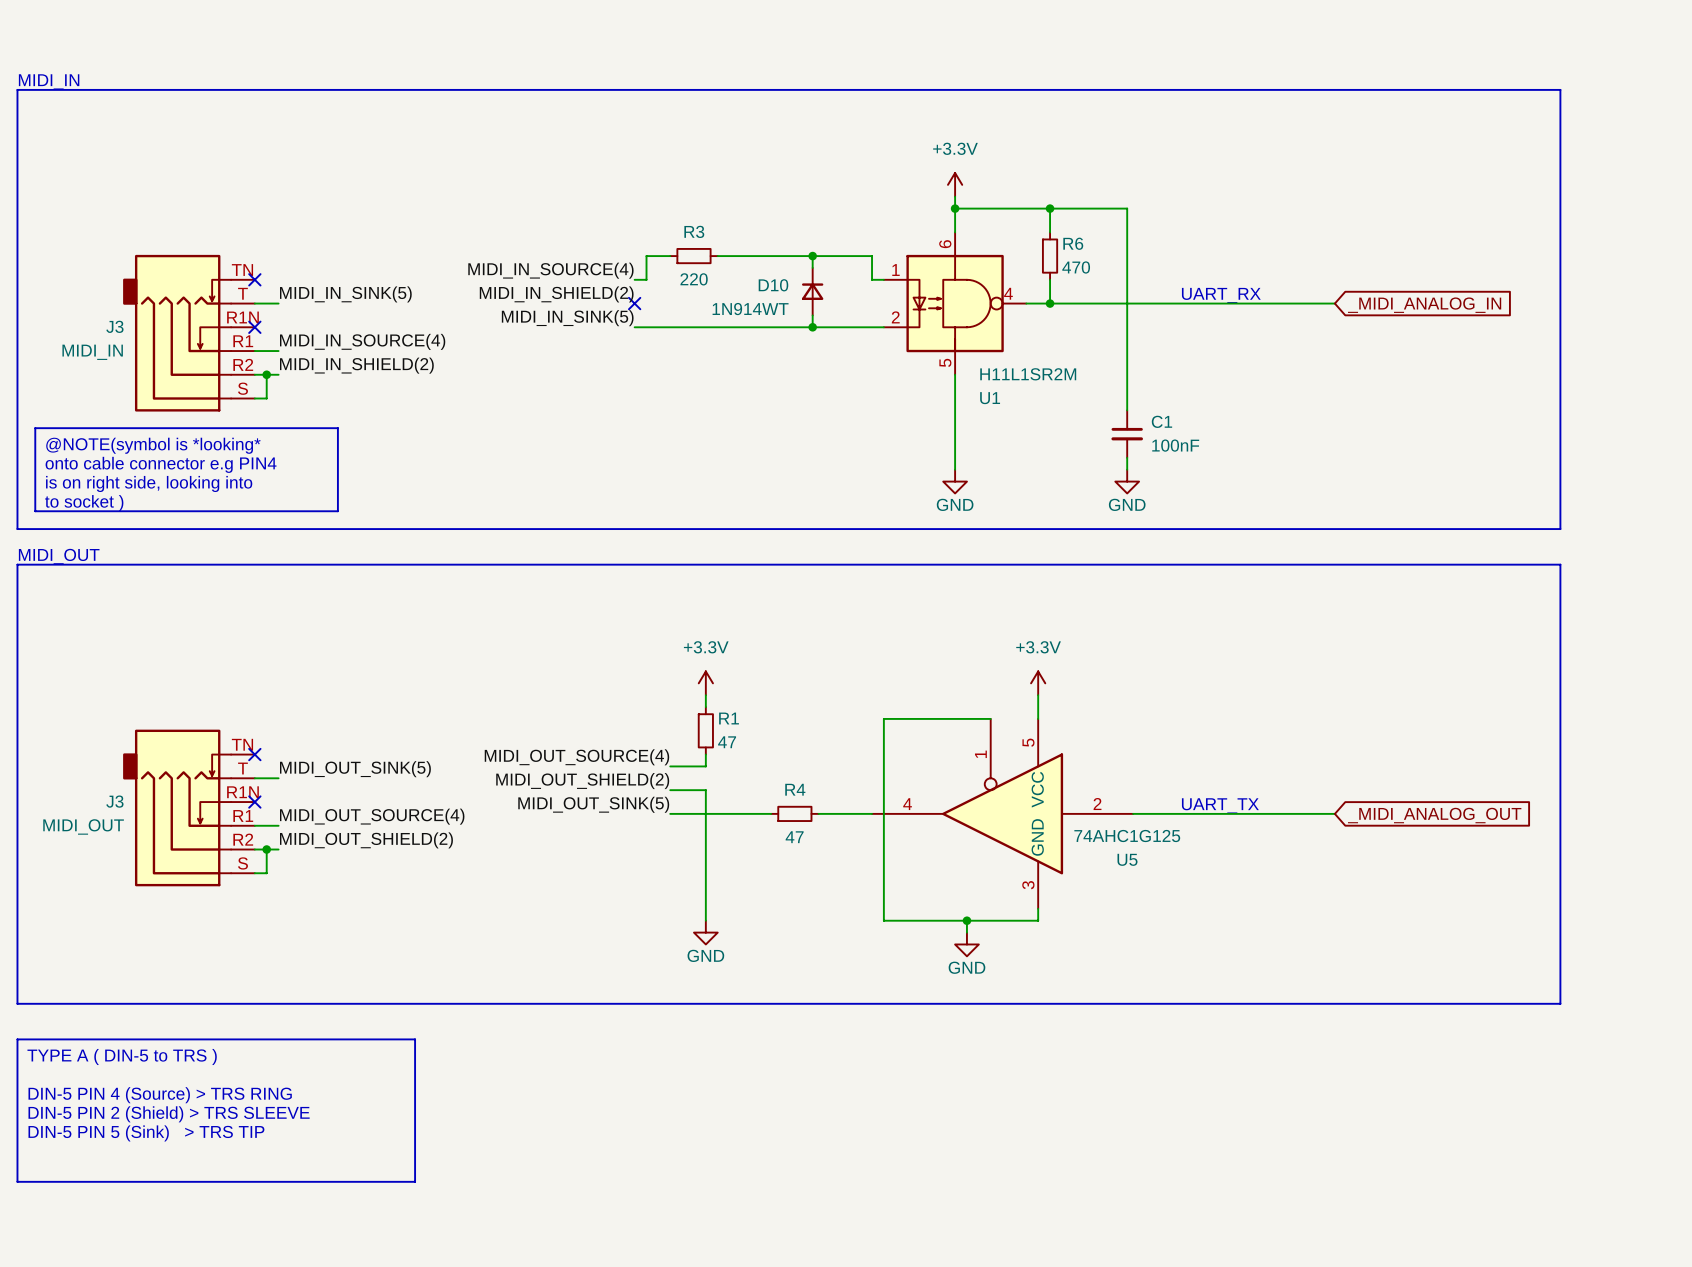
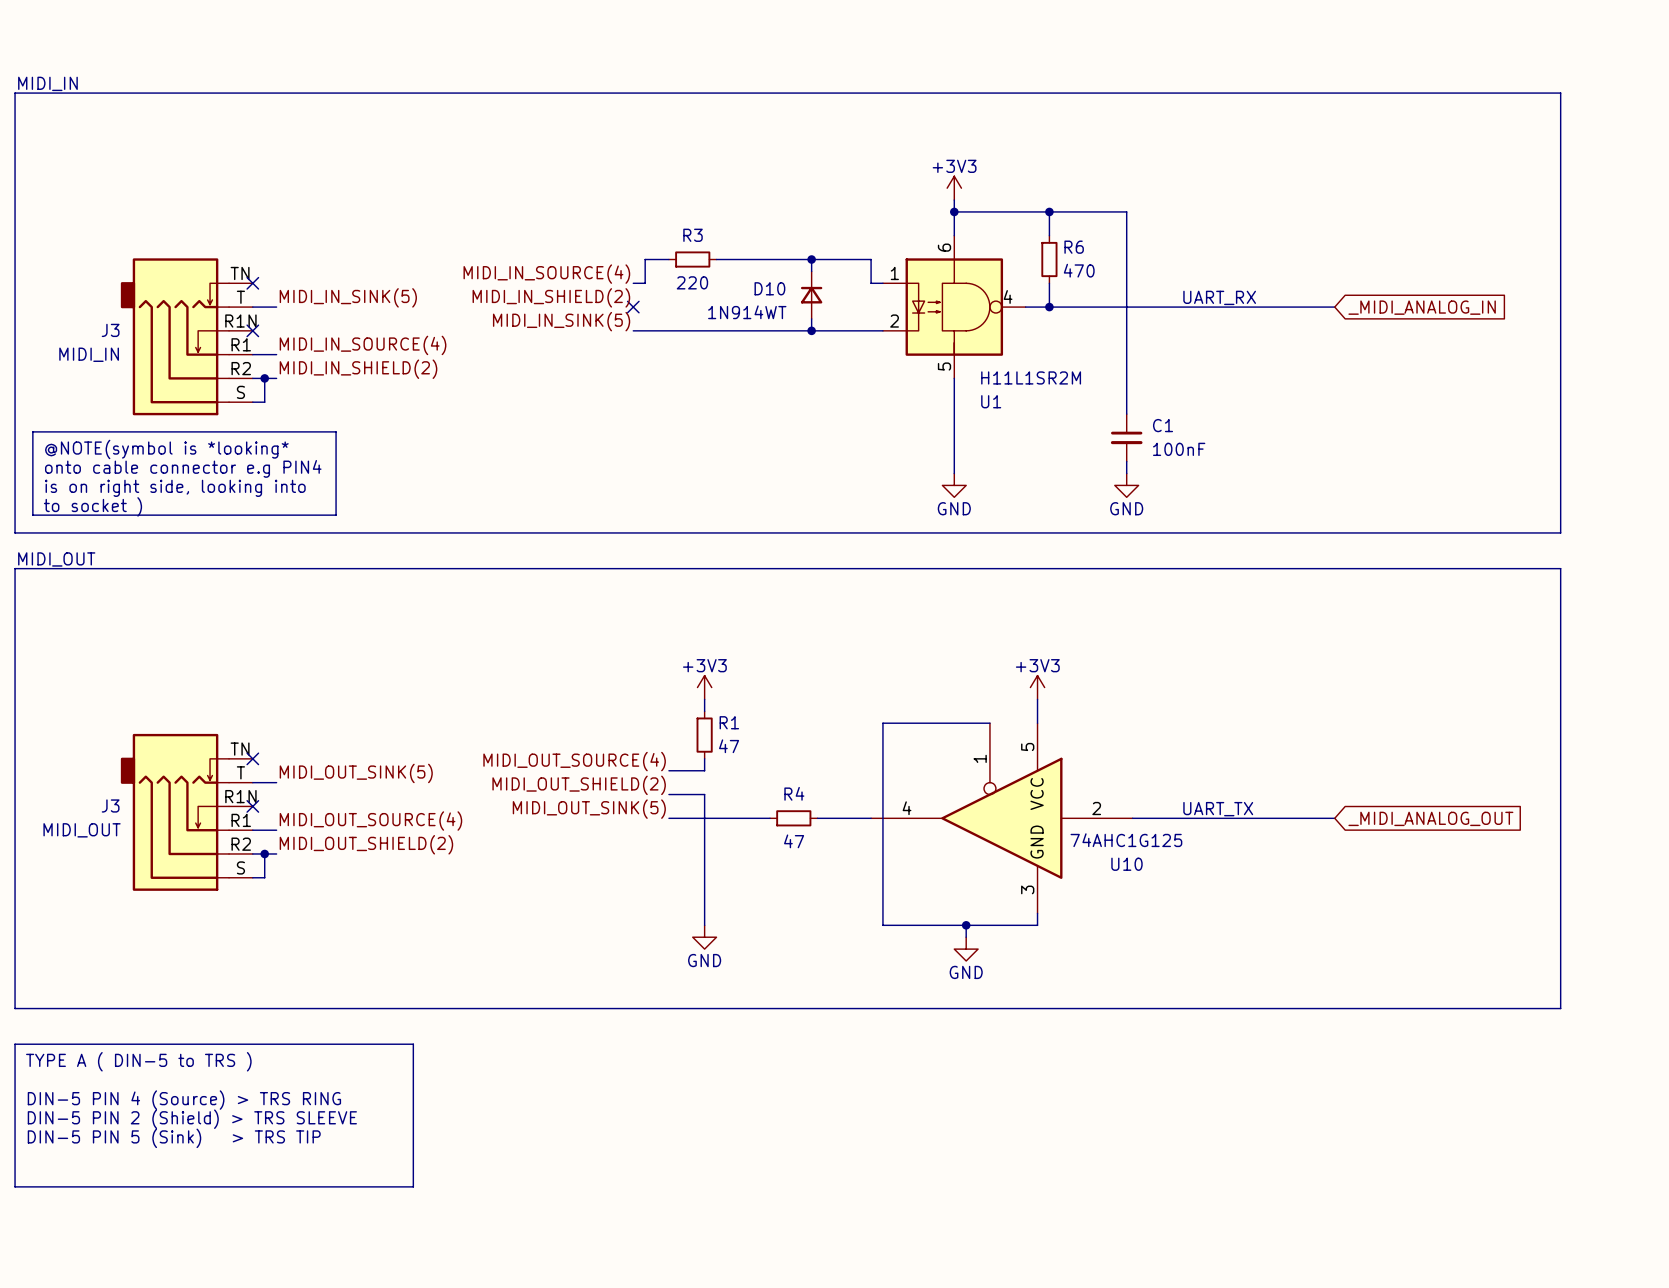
power symbol: +3.3V (955, 184) -> +3V3 (954, 188)
power symbol: +3.3V (705, 683) -> +3V3 (704, 687)
power symbol: +3.3V (1038, 683) -> +3V3 (1037, 687)
U5 name: U5 (1127, 859) -> U10 (1126, 864)

